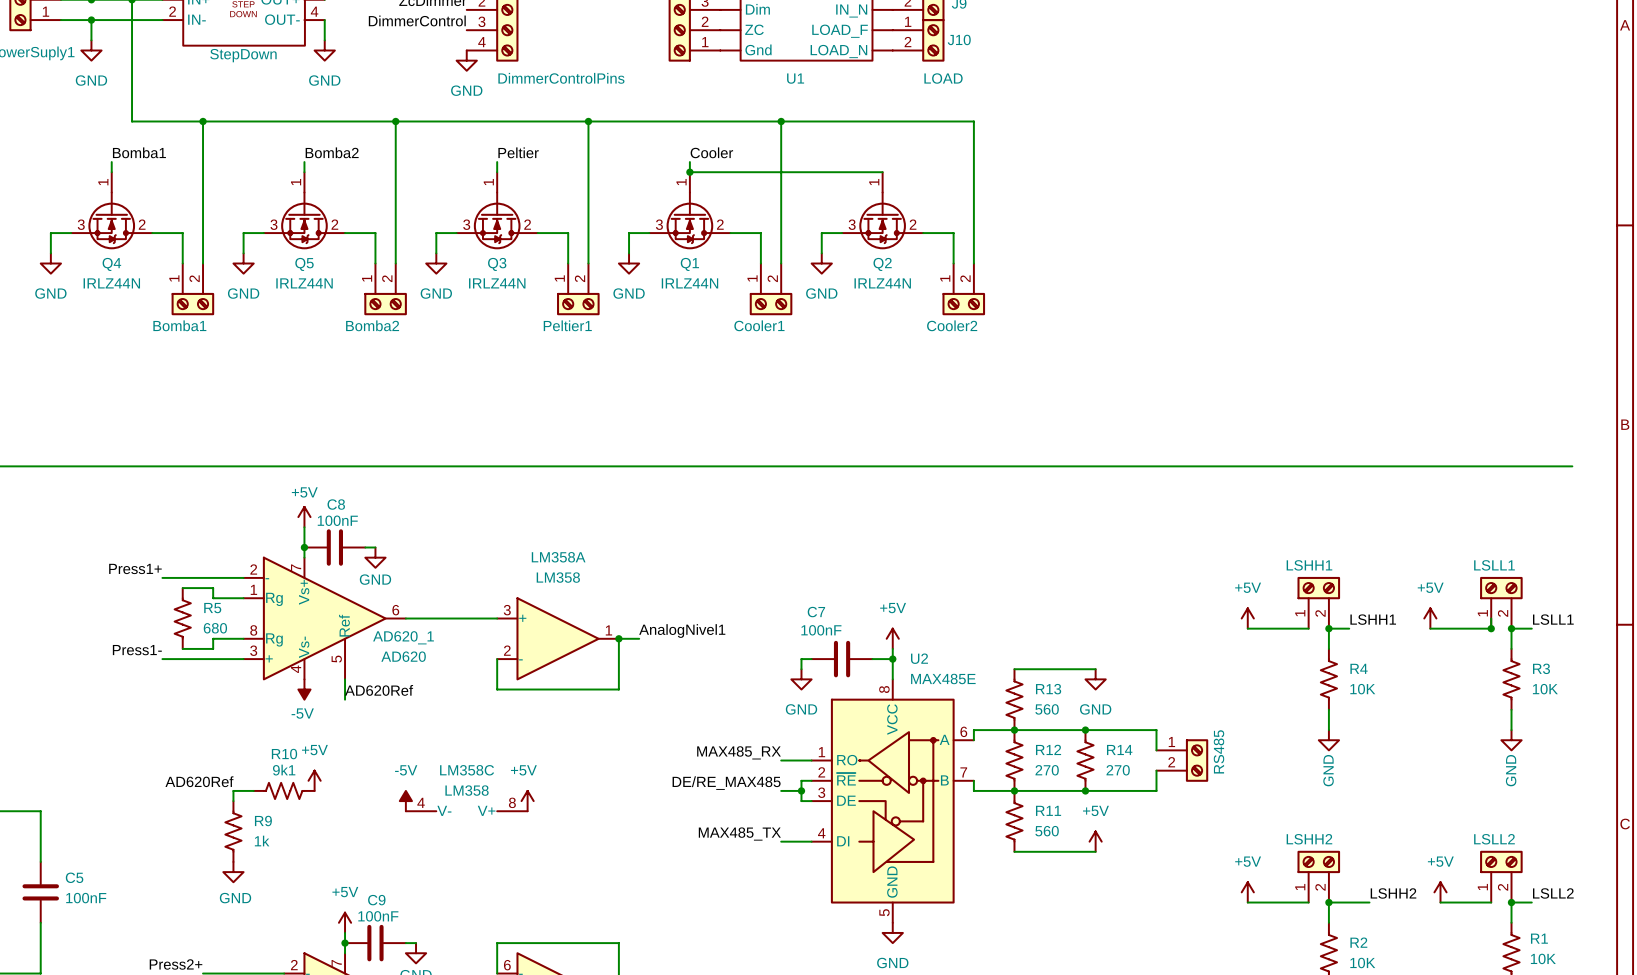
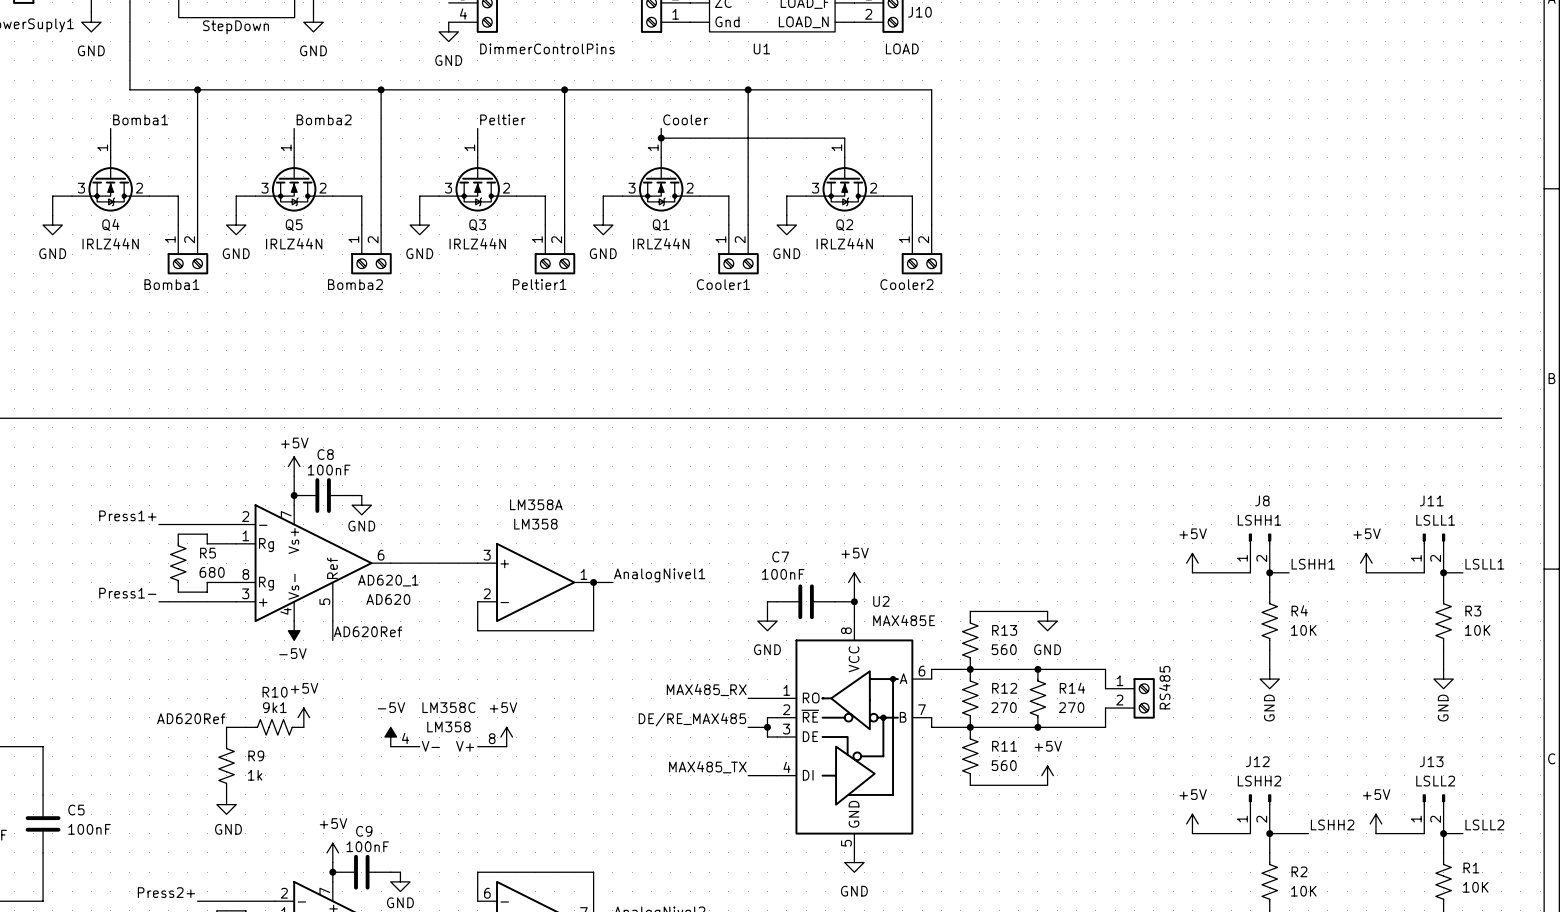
LSHH1: (1318, 602) -> none
LSLL1: (1501, 602) -> none
J8: none -> LSHH1 (1260, 553)
J11: none -> LSLL1 (1433, 553)
junction: (1491, 628) -> none
LSHH2: (1318, 876) -> none
LSLL2: (1501, 876) -> none
J12: none -> LSHH2 (1260, 813)
J13: none -> LSLL2 (1433, 813)

